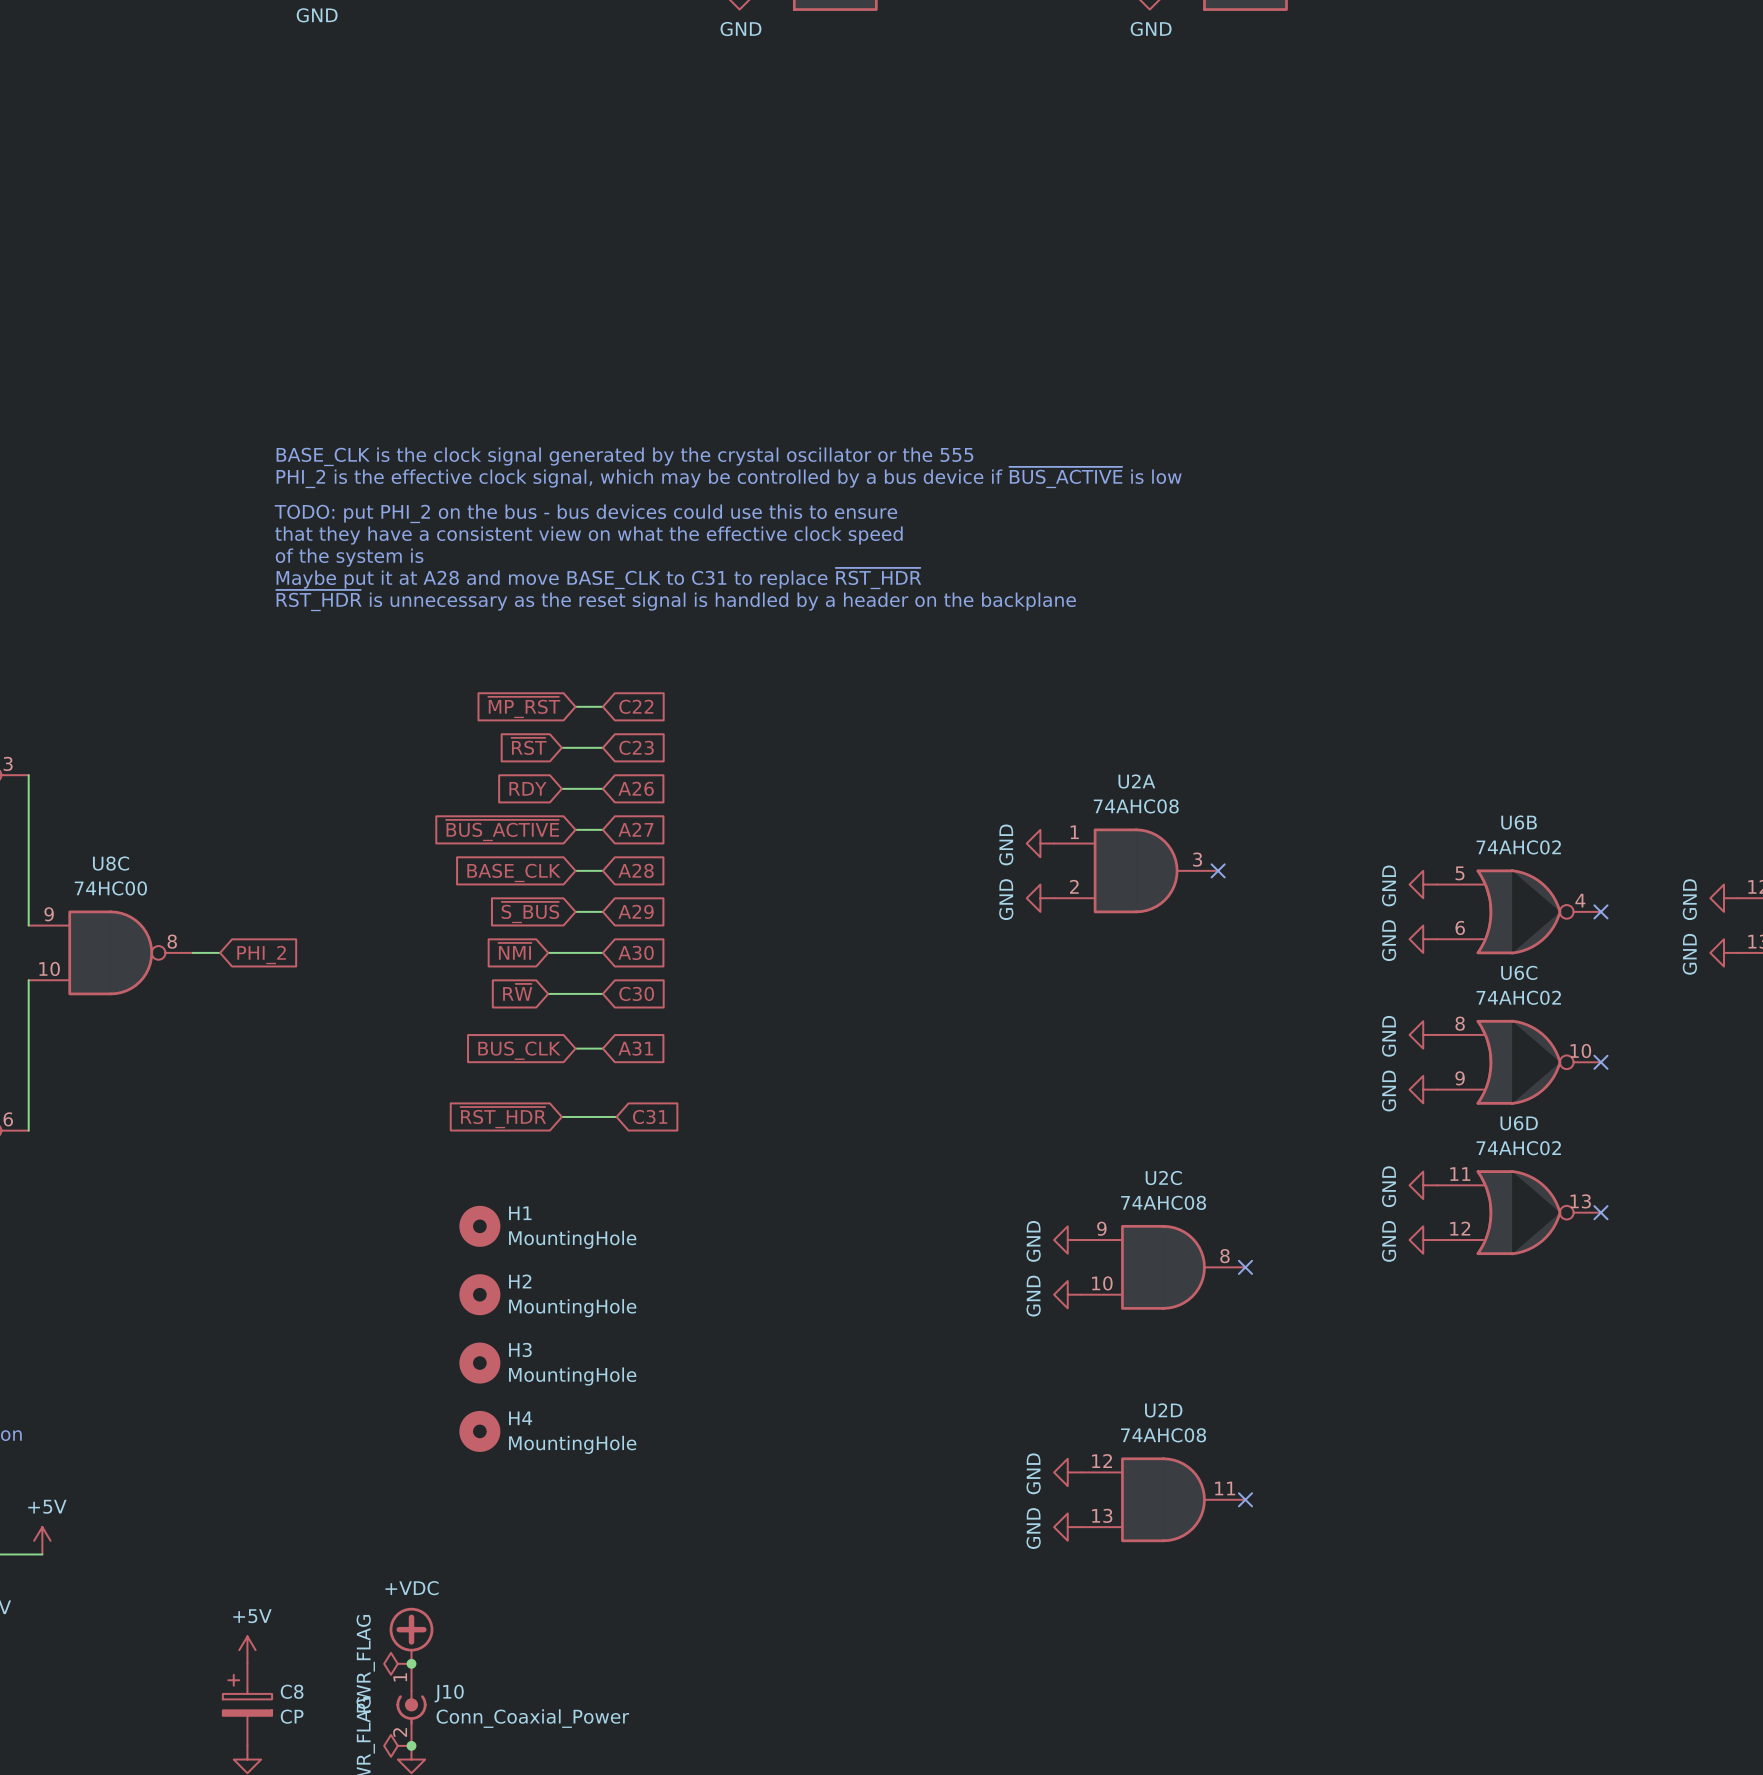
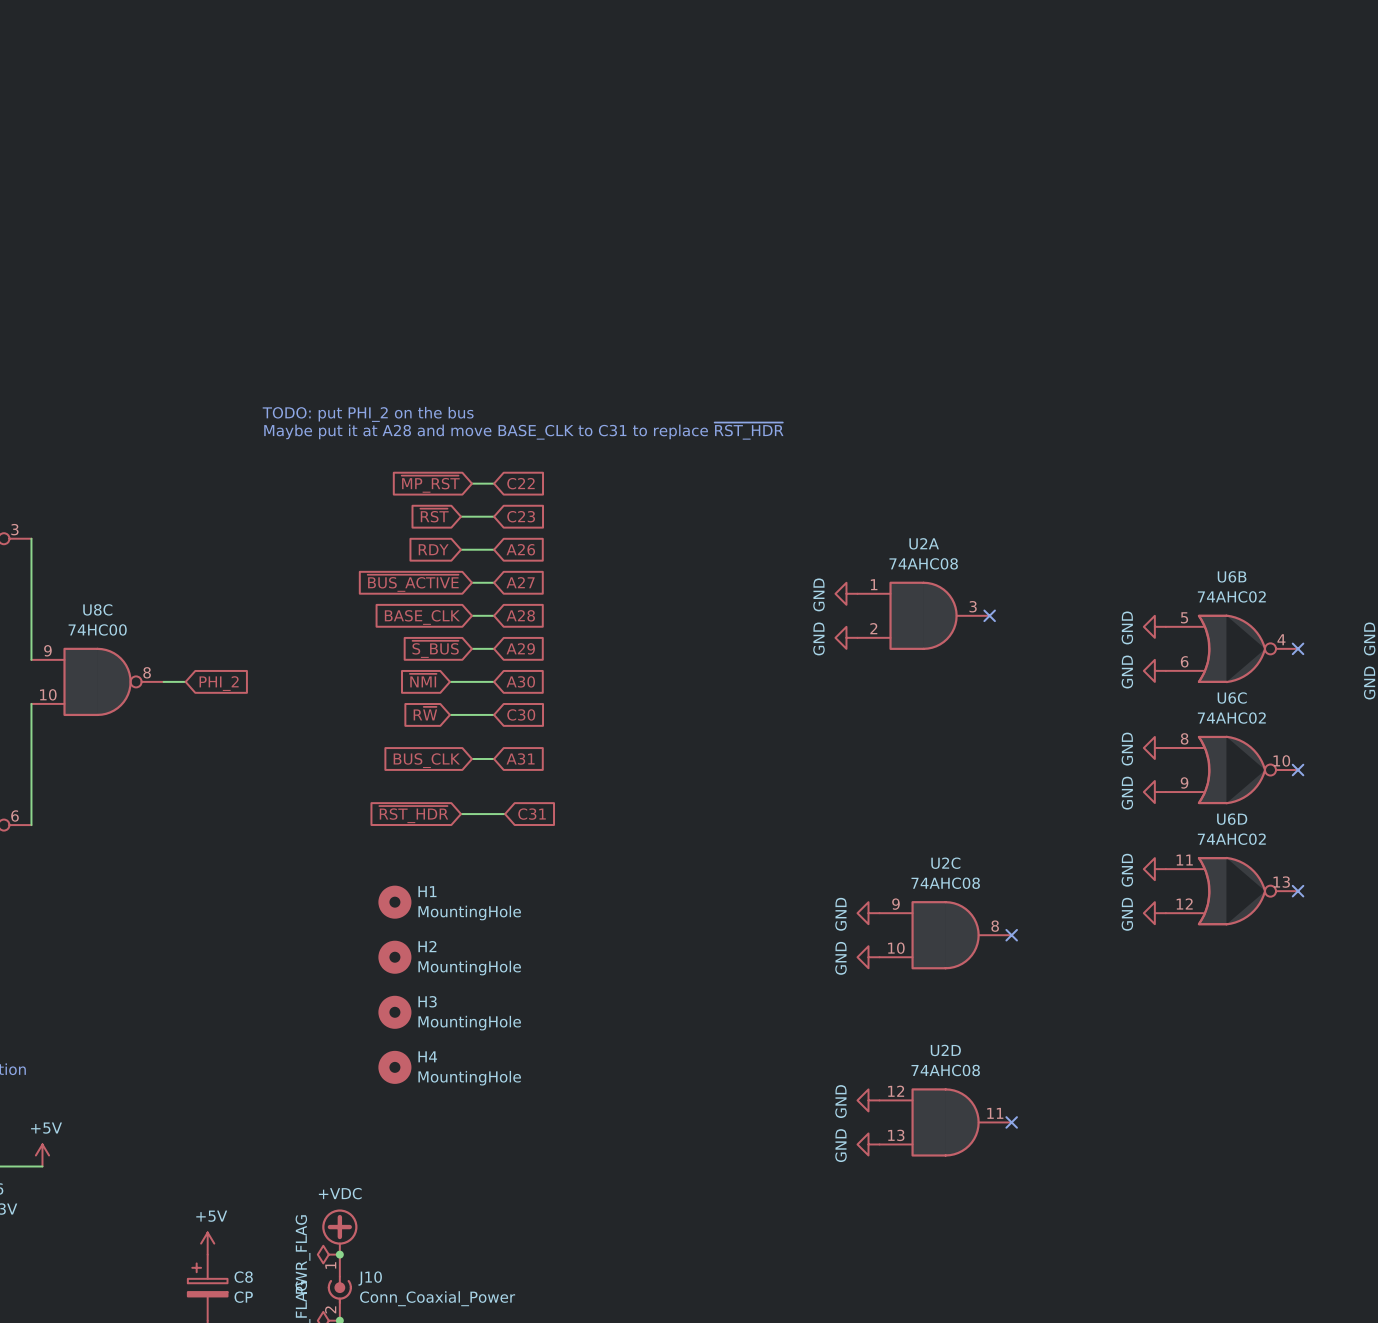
text: BASE_CLK is the clock signal generated by the crystal oscillator or the 555 (624, 456) -> none
text: PHI_2 is the effective clock signal, which may be controlled by a bus device if ~{BUS_ACTIVE} is low (729, 477) -> none
text: TODO: put PHI_2 on the bus - bus devices could use this to ensure (585, 513) -> none
text: that they have a consistent view on what the effective clock speed (588, 535) -> none
text: of the system is (349, 557) -> none
text position: Maybe put it at A28 and move BASE_CLK to C31 to replace ~{RST_HDR} (598, 578) -> Maybe put it at A28 and move BASE_CLK to C31 to replace ~{RST_HDR} (523, 431)
text: ~{RST_HDR} is unnecessary as the reset signal is handled by a header on the backplane (676, 600) -> none
text: none -> TODO: put PHI_2 on the bus (368, 414)

